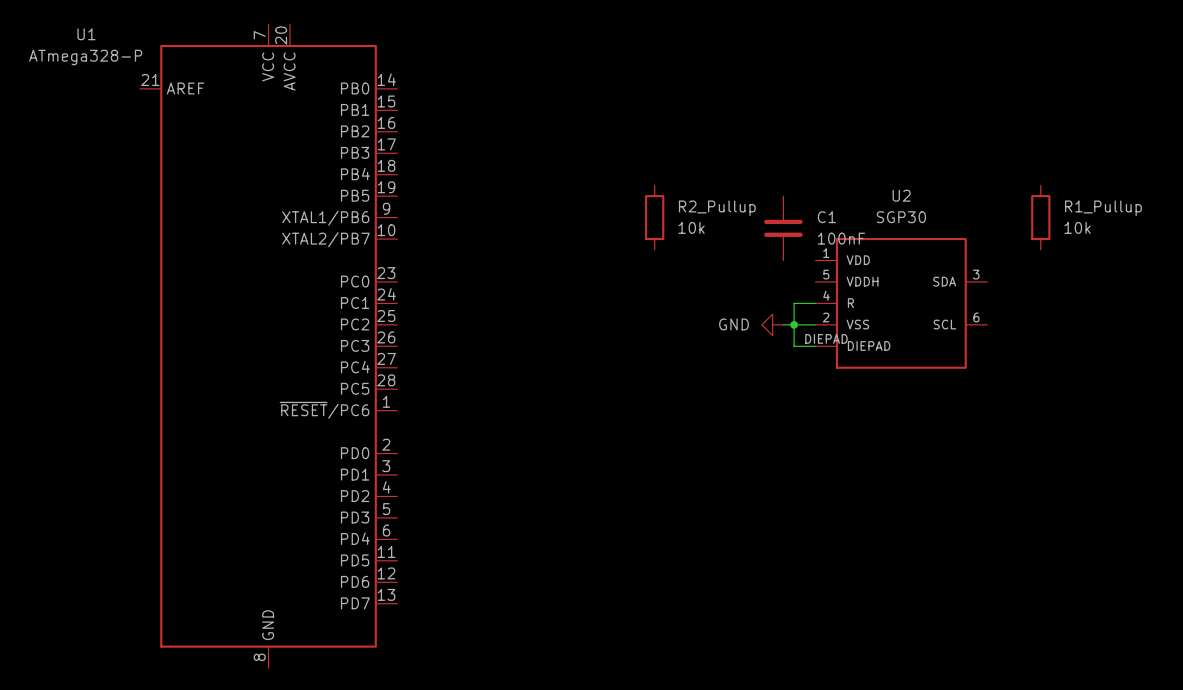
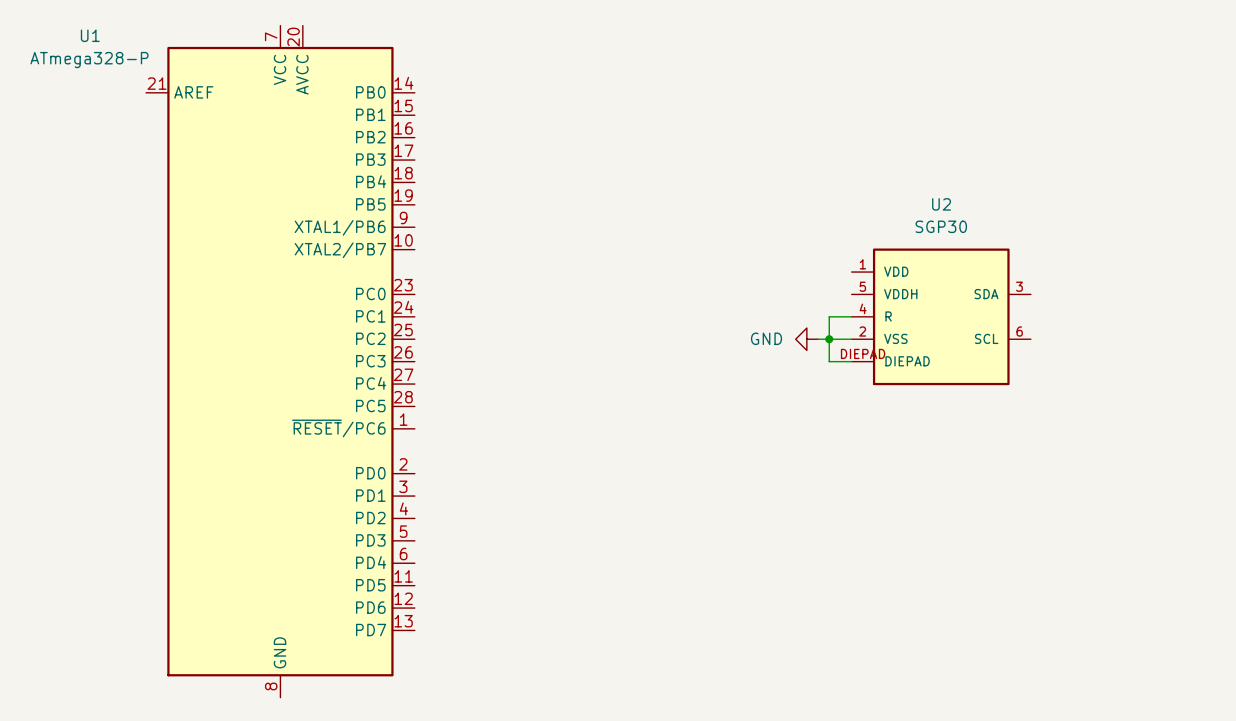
R2_Pullup: 10k (654, 217) -> none
R1_Pullup: 10k (1040, 217) -> none
C1: 100nF (783, 228) -> none

